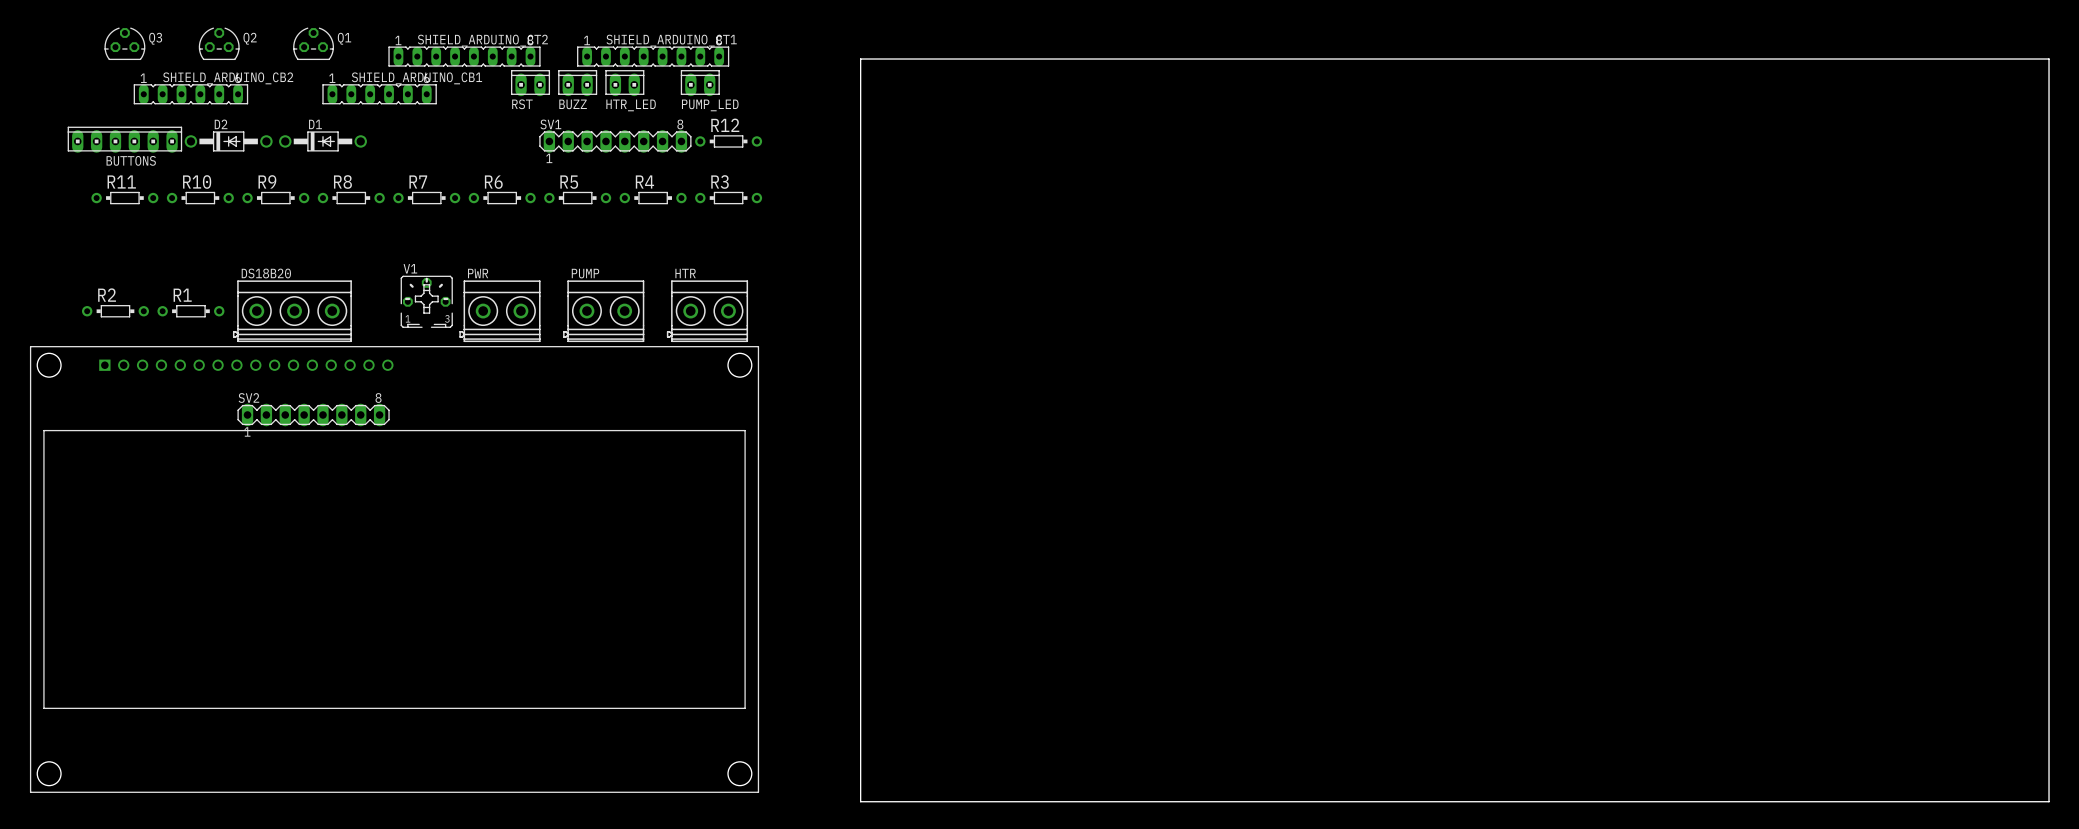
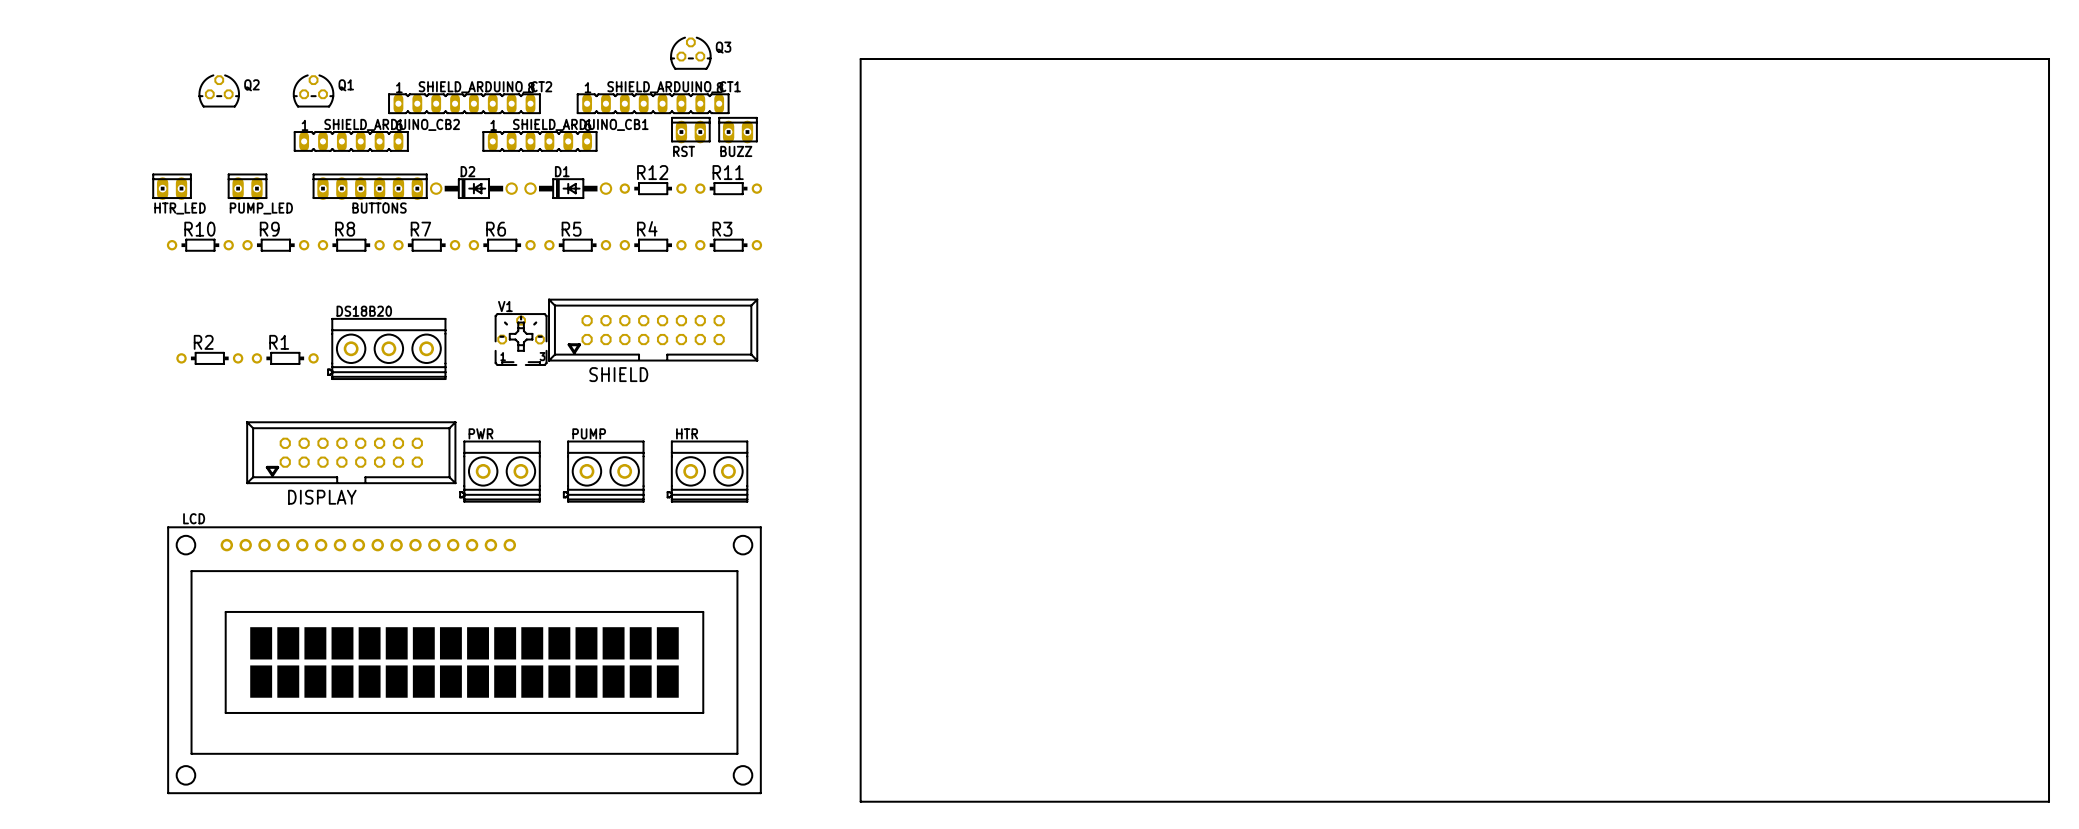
Q3 position: (124, 43) -> (690, 53)
Q2 position: (219, 43) -> (219, 90)
Q1 position: (313, 43) -> (313, 90)
SHIELD_ARDUINO_CT2 position: (464, 56) -> (464, 103)
SHIELD_ARDUINO_CT1 position: (653, 56) -> (653, 103)
RST position: (530, 83) -> (690, 130)
BUZZ position: (577, 83) -> (738, 130)
HTR_LED: (624, 83) -> none
PUMP_LED: (700, 83) -> none
SHIELD_ARDUINO_CB2 position: (190, 94) -> (351, 141)
SHIELD_ARDUINO_CB1 position: (379, 94) -> (539, 141)
BUTTONS: (124, 139) -> none
D2 position: (228, 141) -> (473, 188)
D1 position: (322, 141) -> (568, 188)
SV1: (615, 141) -> none
R12 position: (728, 141) -> (653, 188)
HTR_LED: none -> (172, 186)
PUMP_LED: none -> (247, 186)
BUTTONS: none -> (370, 186)
R11 position: (124, 198) -> (728, 188)
R10 position: (200, 198) -> (200, 245)
R9 position: (275, 198) -> (275, 245)
R8 position: (351, 198) -> (351, 245)
R7 position: (426, 198) -> (426, 245)
R6 position: (502, 198) -> (502, 245)
R5 position: (577, 198) -> (577, 245)
R4 position: (653, 198) -> (653, 245)
R3 position: (728, 198) -> (728, 245)
V1 position: (426, 301) -> (521, 339)
R2 position: (115, 311) -> (209, 358)
R1 position: (190, 311) -> (285, 358)
DS18B20 position: (292, 311) -> (386, 348)
PWR position: (499, 311) -> (499, 471)
PUMP position: (603, 311) -> (603, 471)
HTR position: (707, 311) -> (707, 471)
SHIELD: none -> (653, 330)
SV2: (313, 414) -> none
DISPLAY: none -> (351, 452)
part: (394, 569) -> none
LCD: none -> (464, 660)

